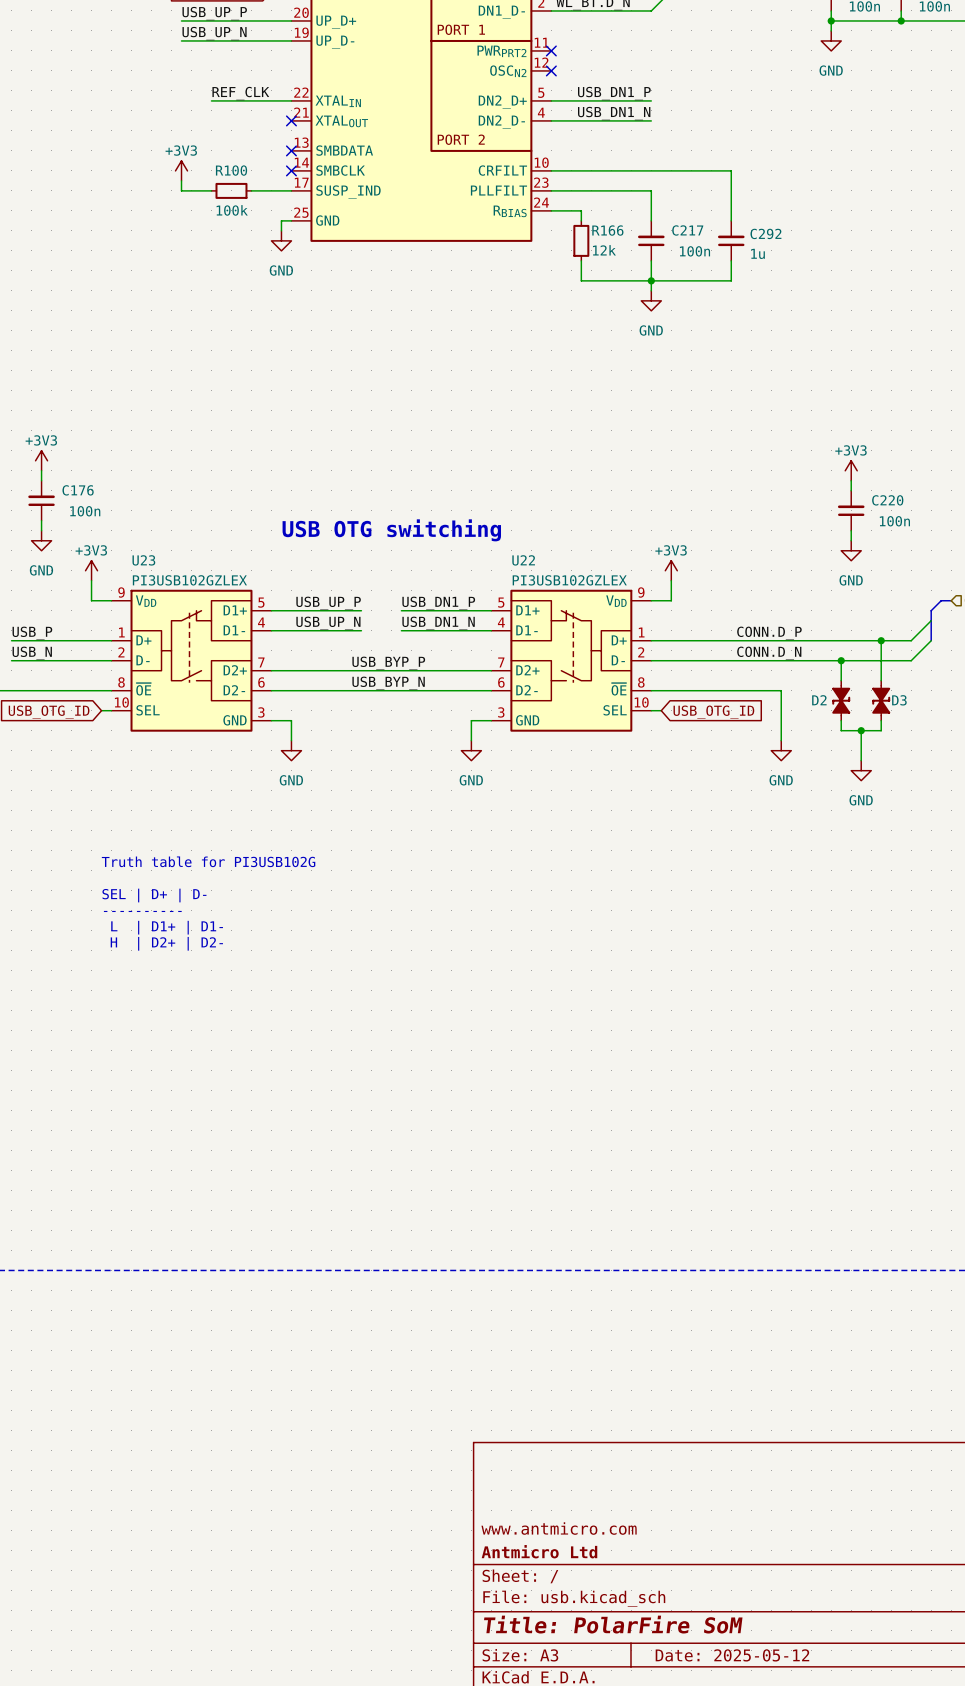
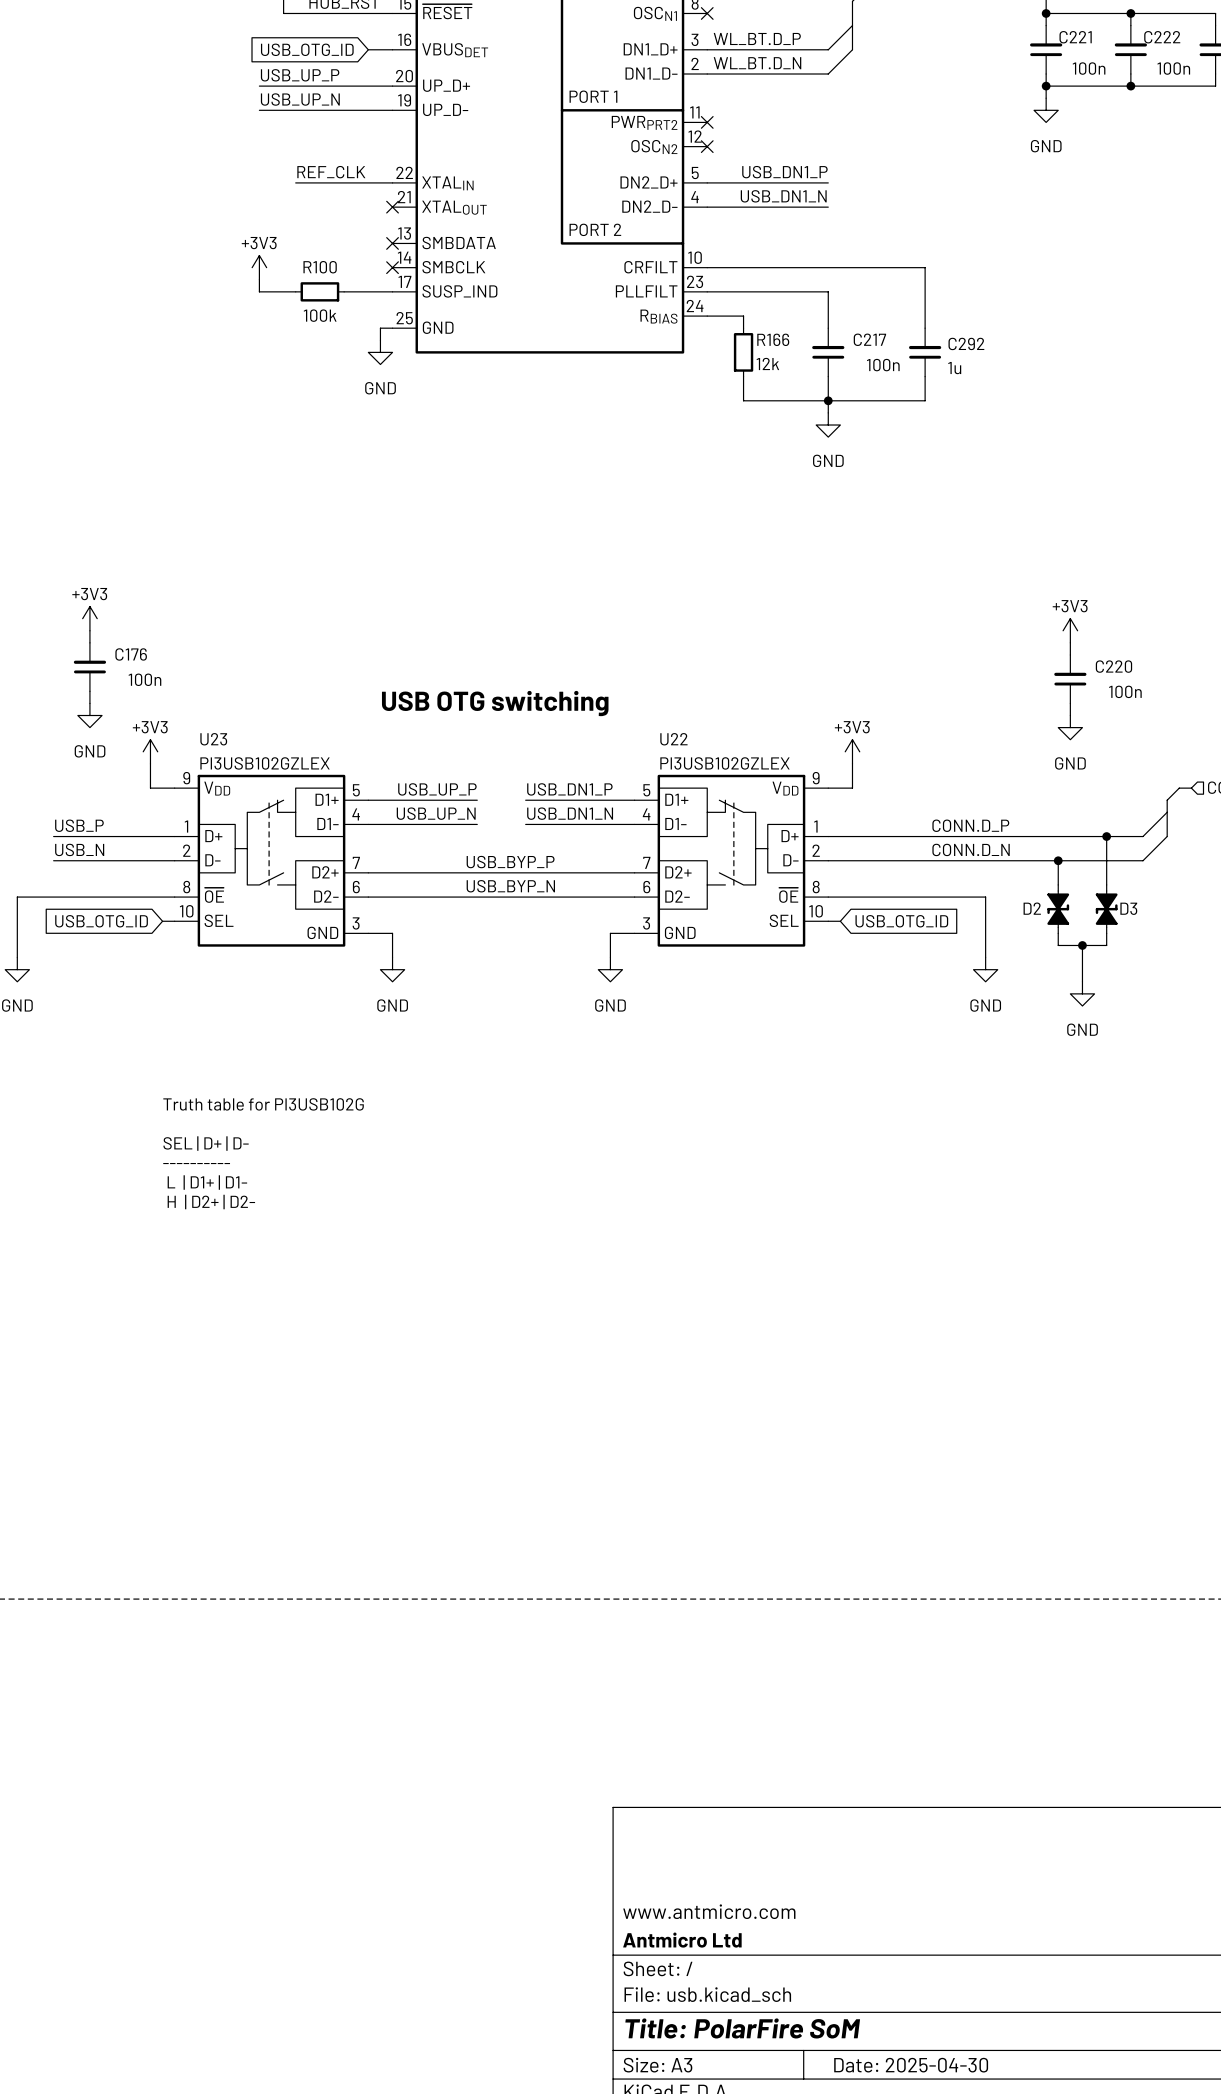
title block: Date: 2025-05-12 (732, 1655) -> Date: 2025-04-30 (911, 2065)

